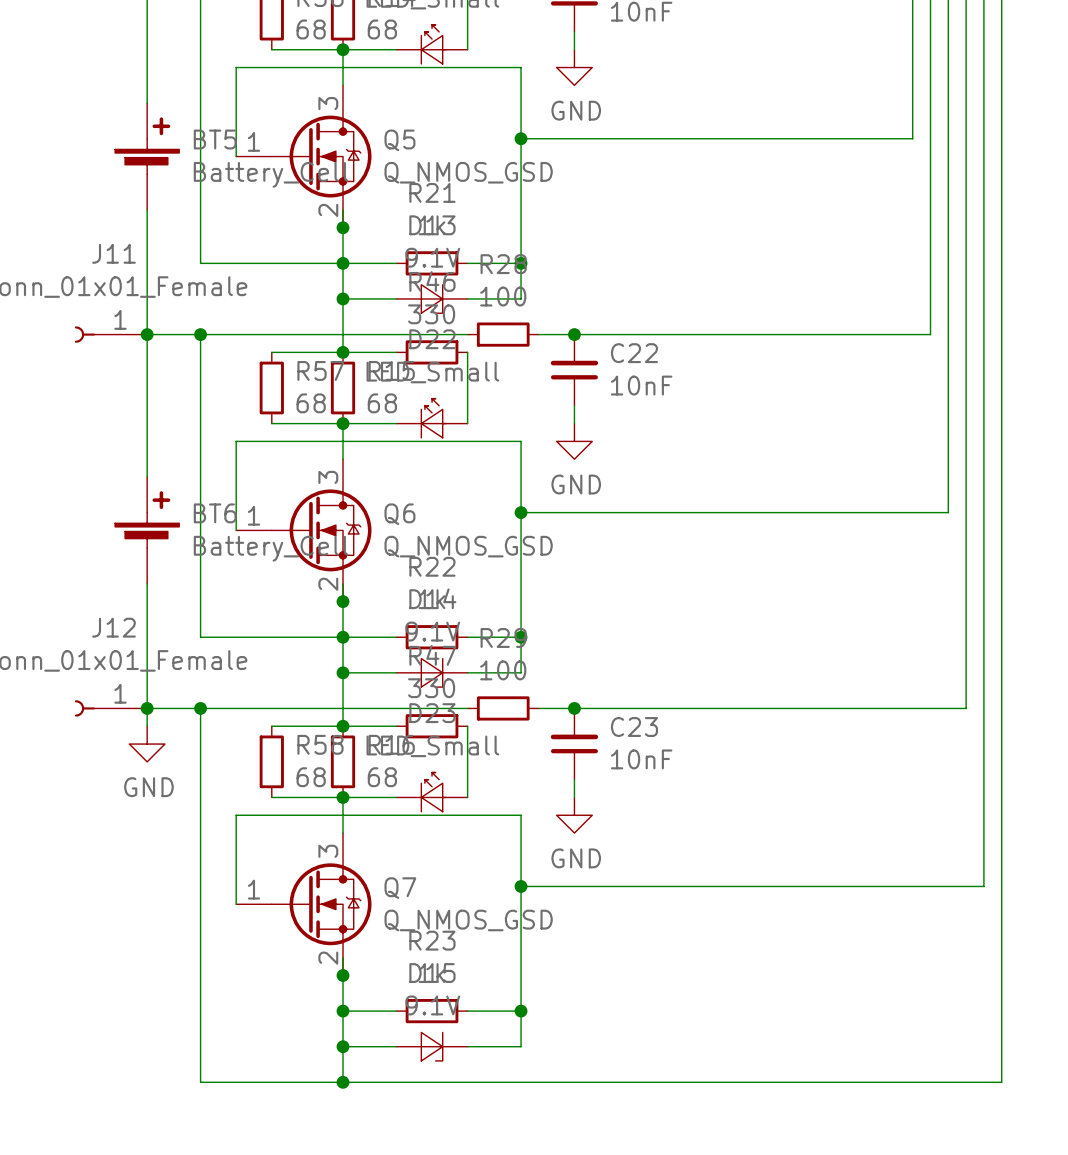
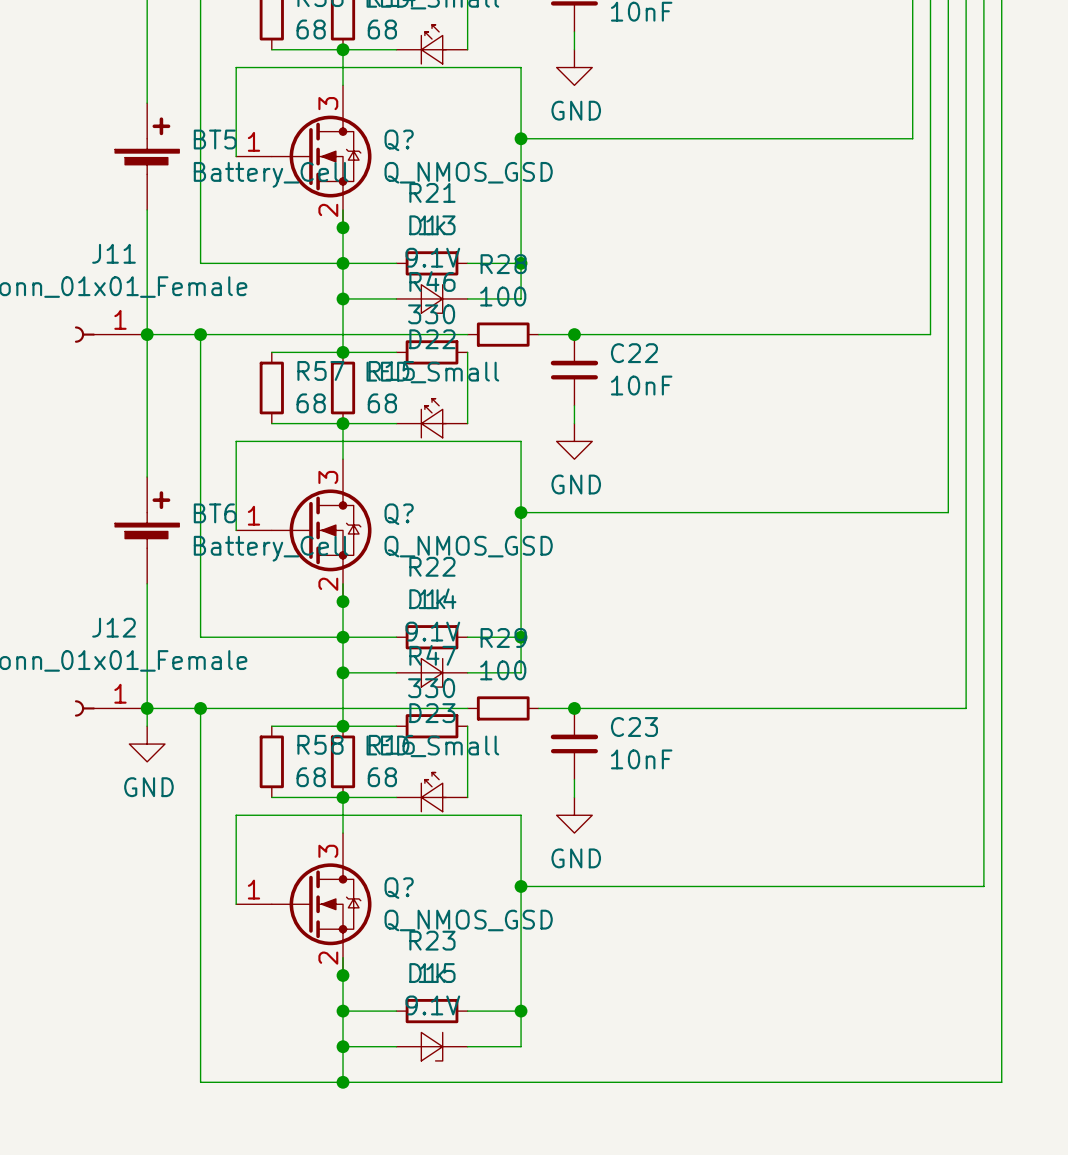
Q5 name: Q5 (399, 140) -> Q? (399, 140)
Q6 name: Q6 (399, 514) -> Q? (399, 514)
Q7 name: Q7 (400, 888) -> Q? (399, 888)

